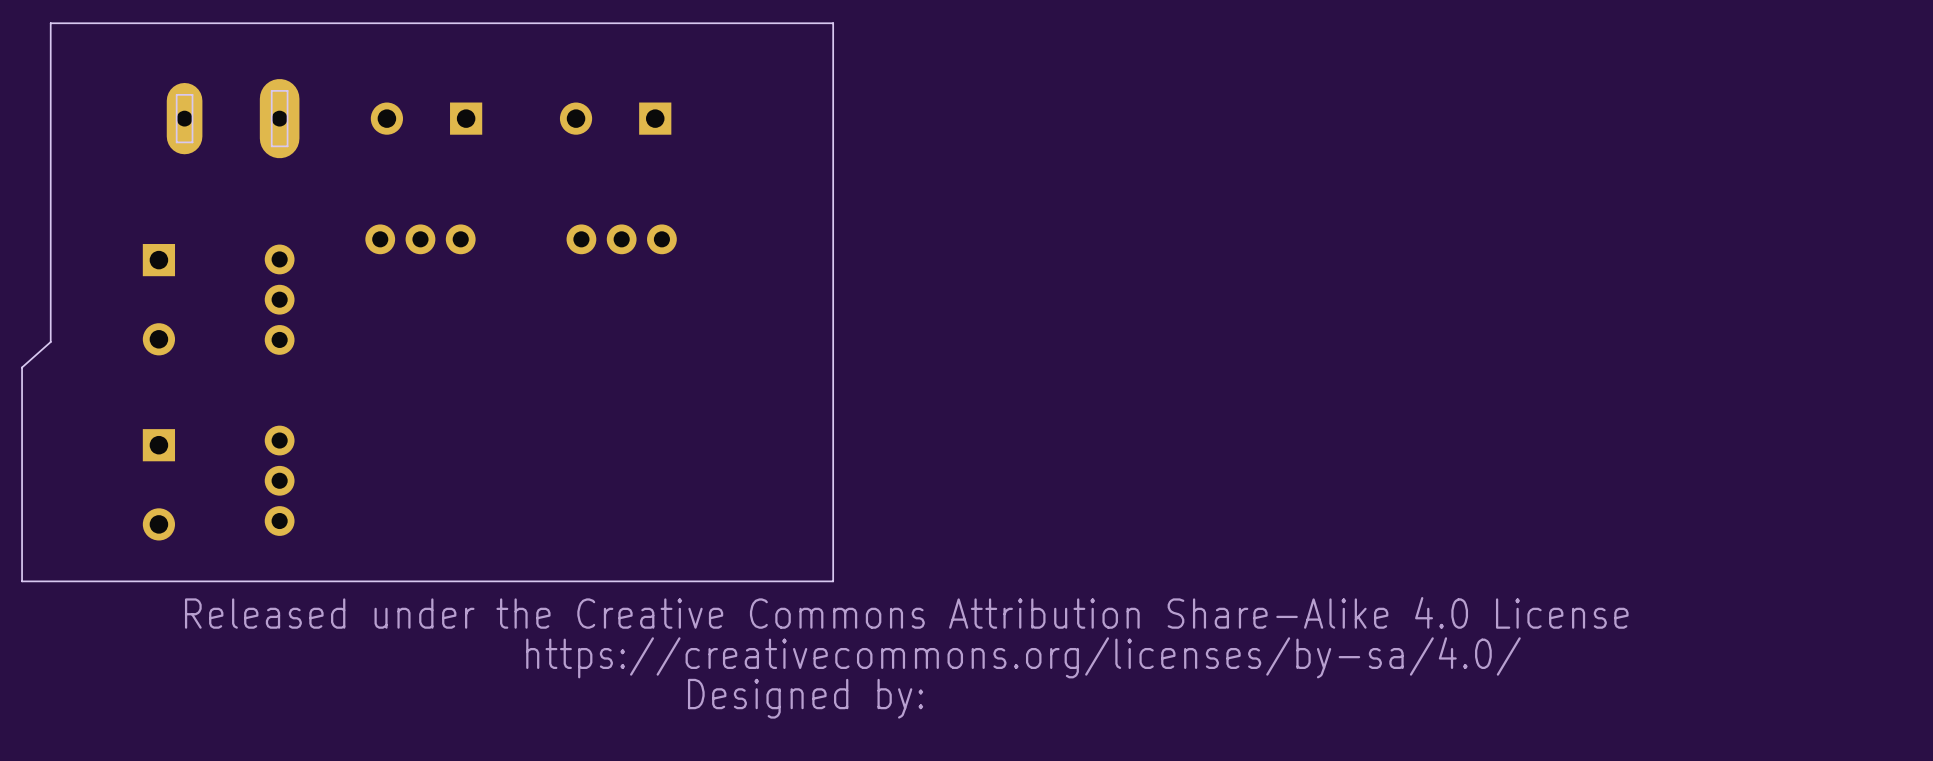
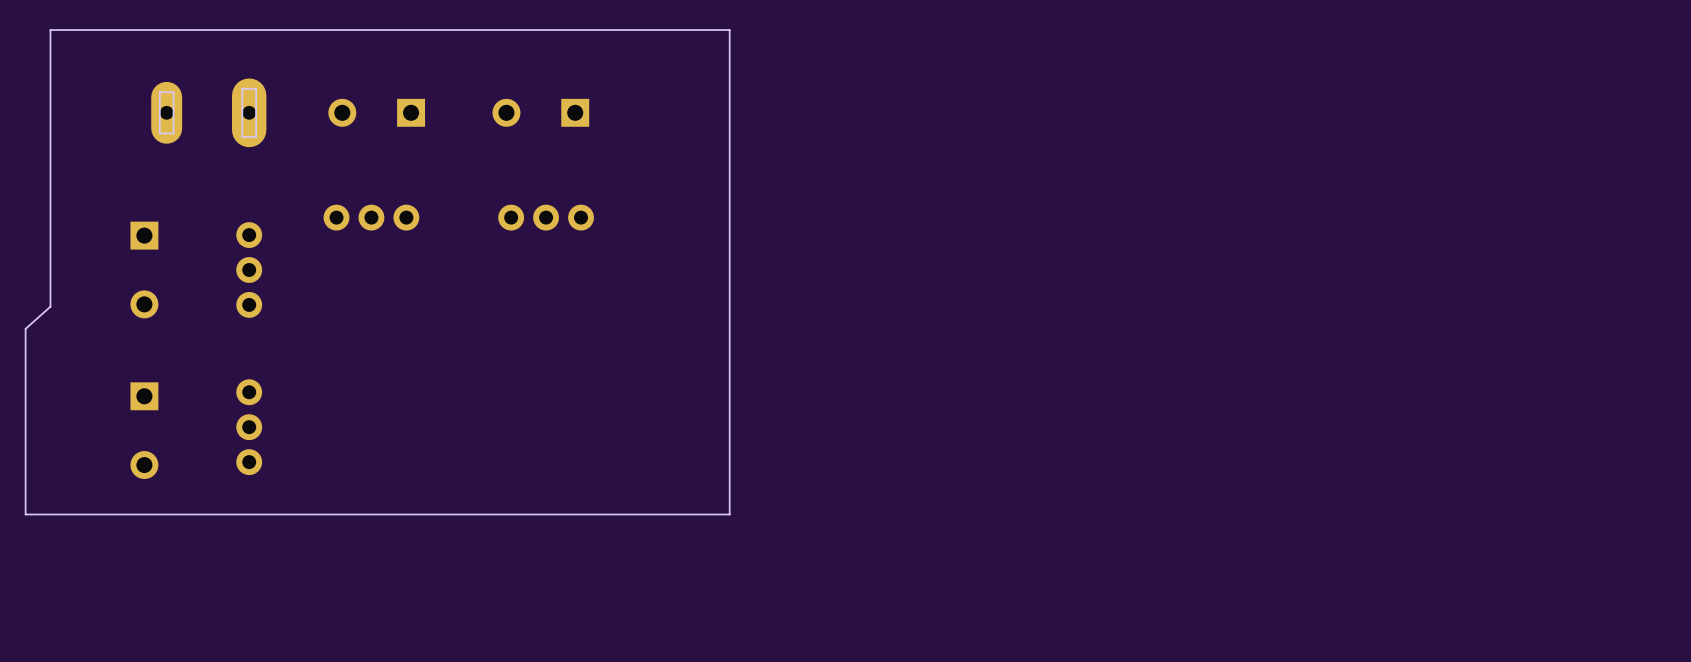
drawing: [184, 597, 1629, 719] -> none

